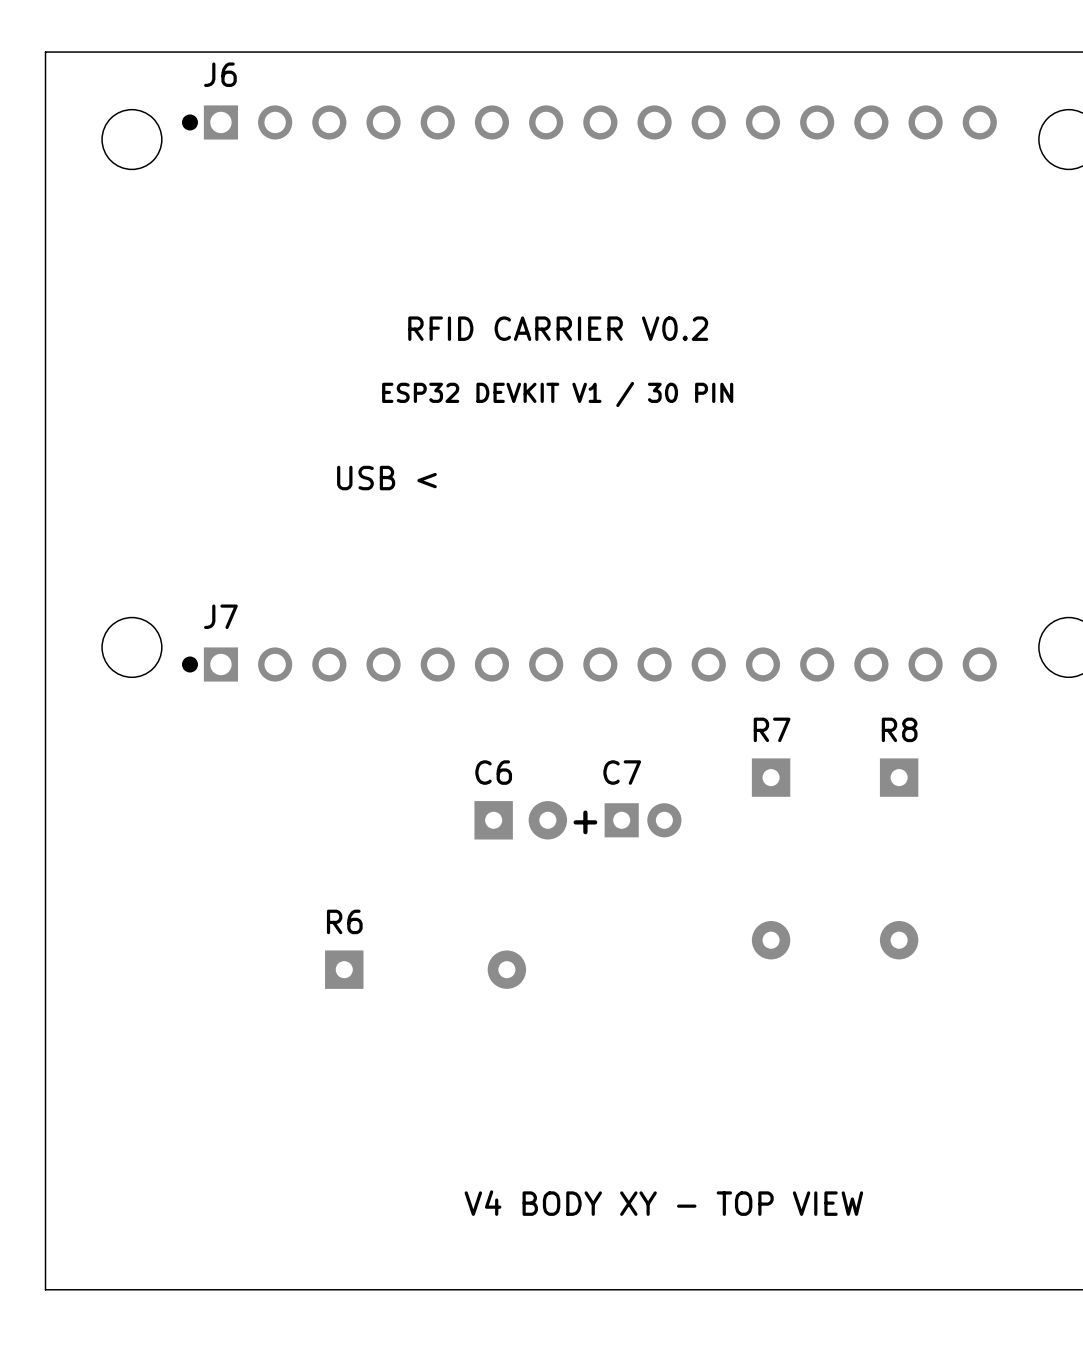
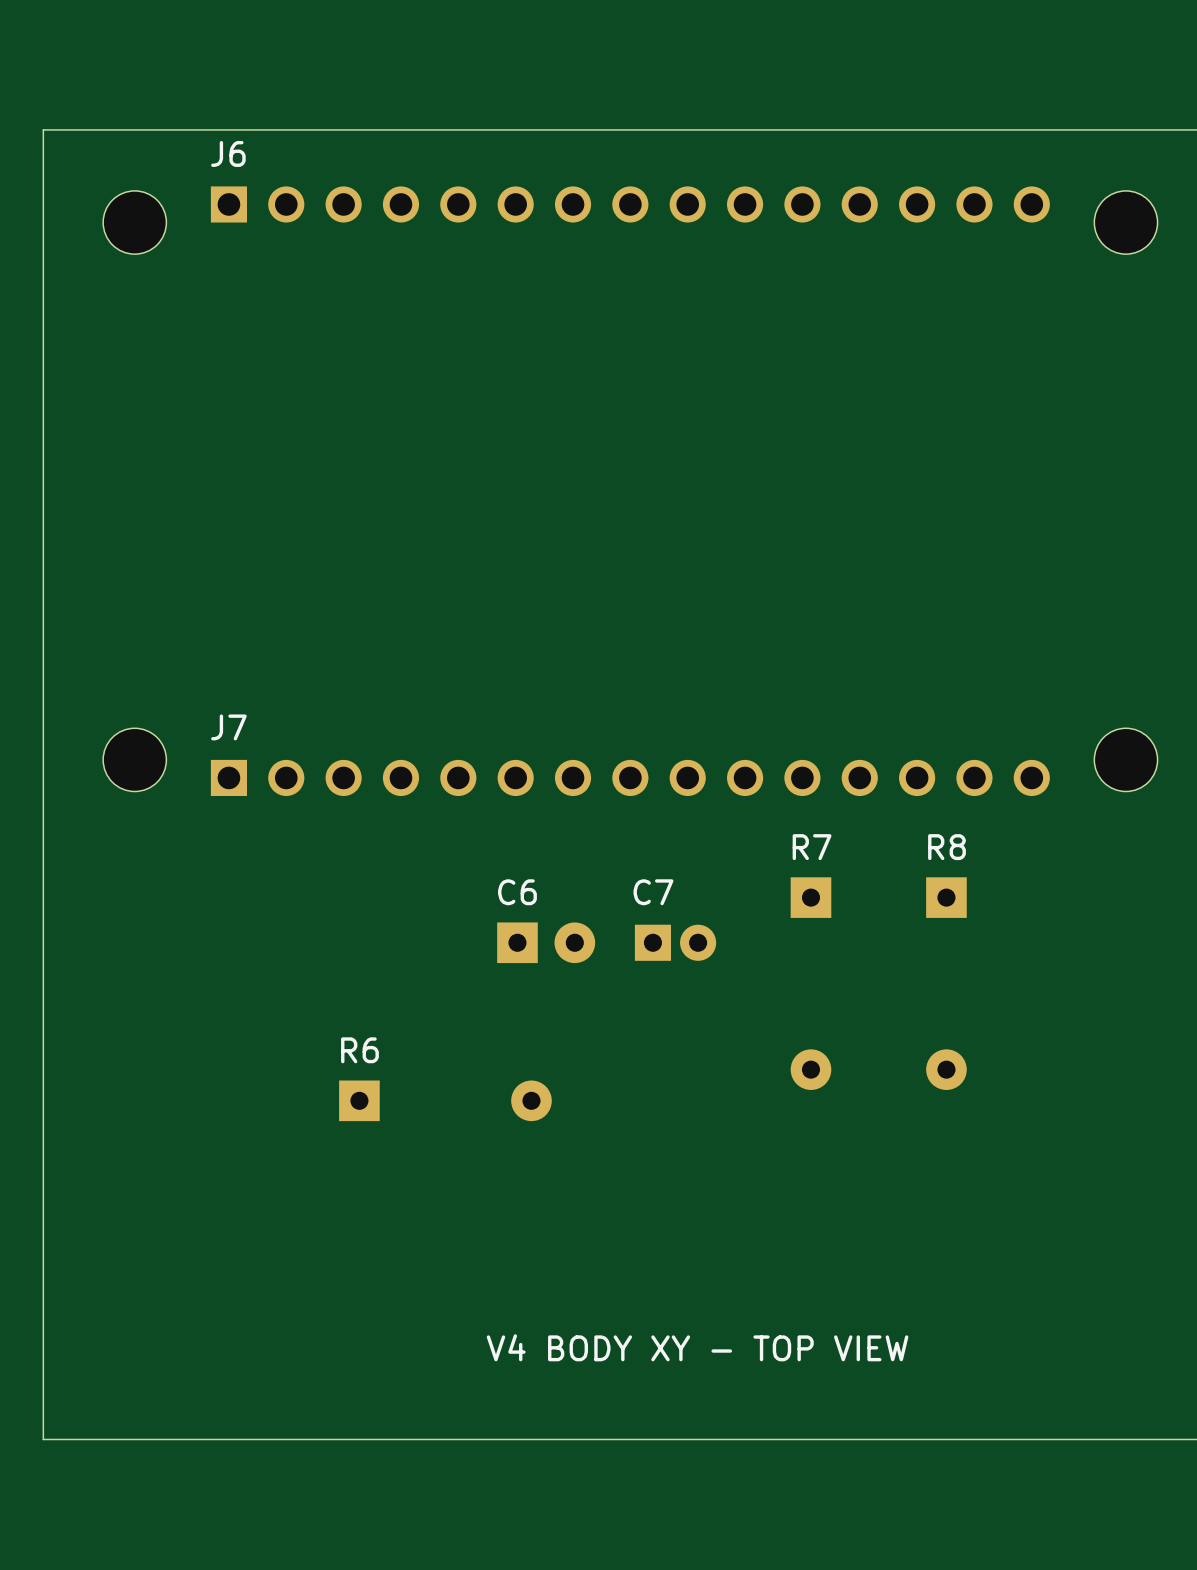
drawing: [181, 114, 198, 131] -> none
text: RFID CARRIER V0.2 (558, 328) -> none
text: ESP32 DEVKIT V1 / 30 PIN (557, 394) -> none
text: USB < (386, 478) -> none
drawing: [181, 656, 198, 673] -> none
text: + (585, 822) -> none

